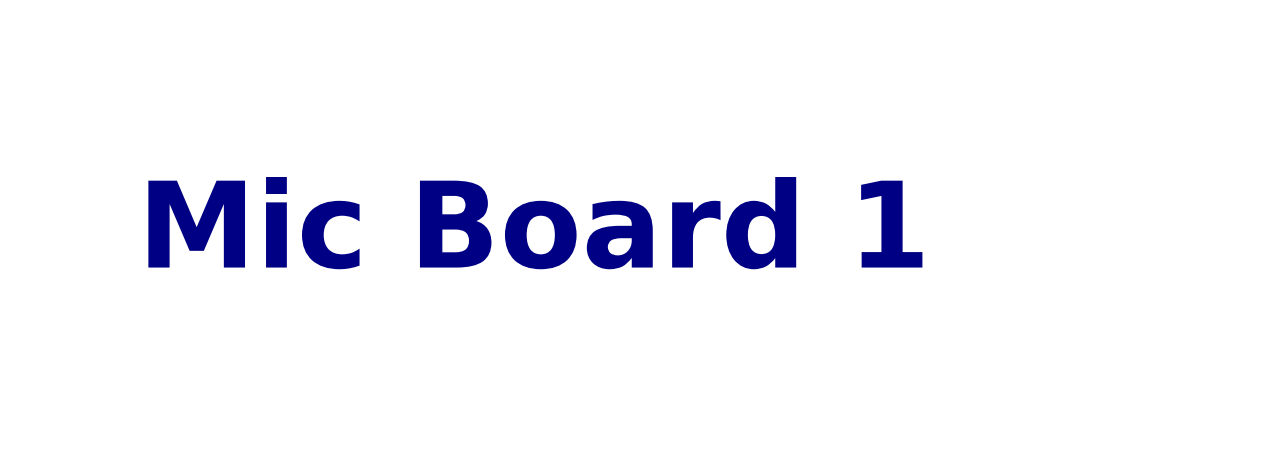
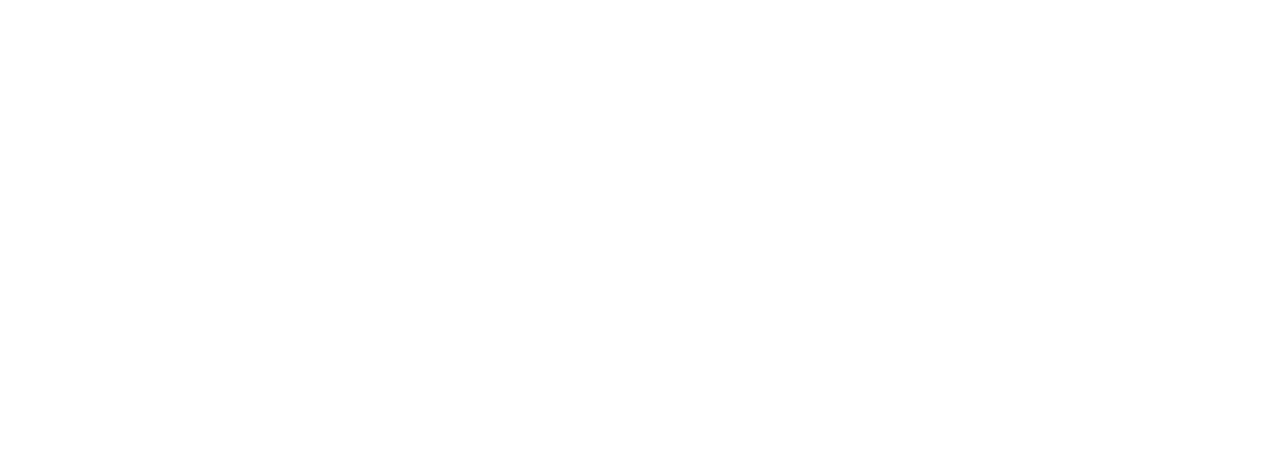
text: Mic Board 1 (535, 223) -> none

